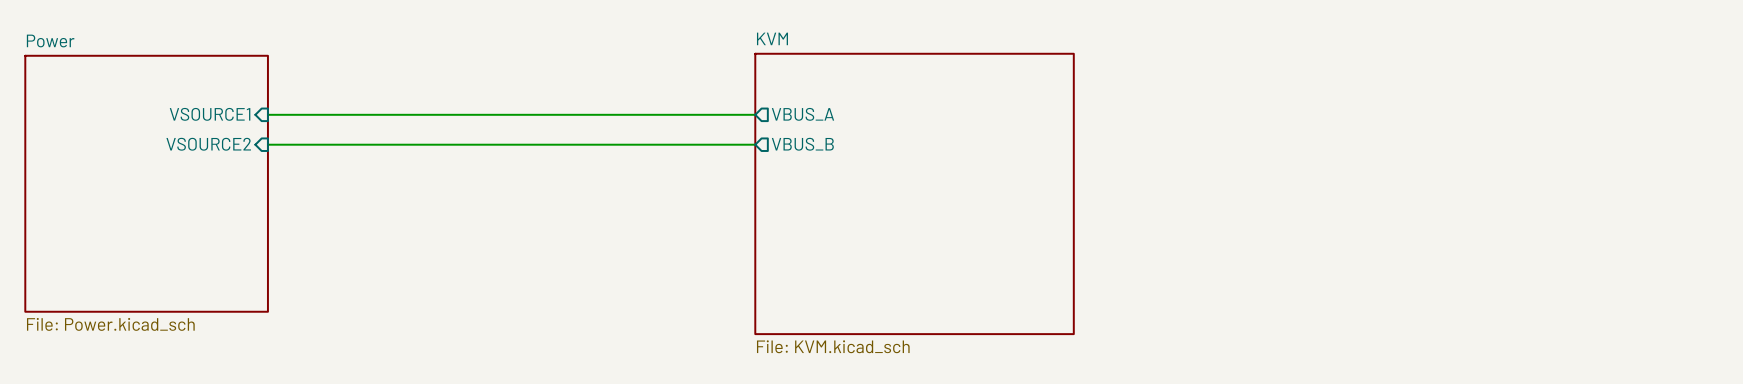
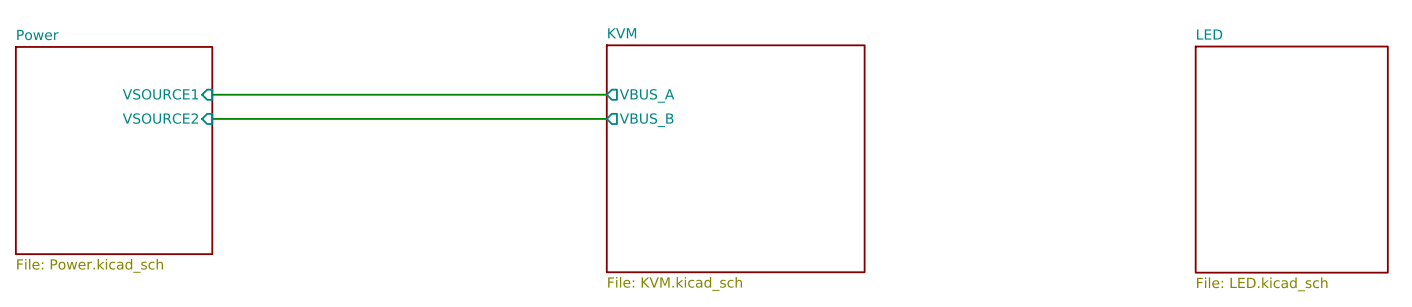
sheet LED: none -> File: LED.kicad_sch (1291, 159)

